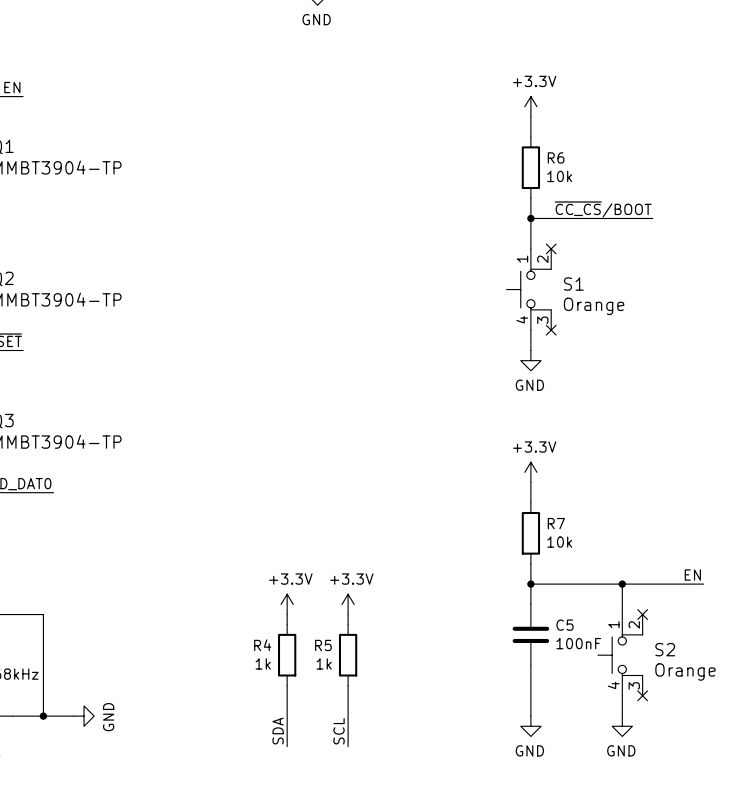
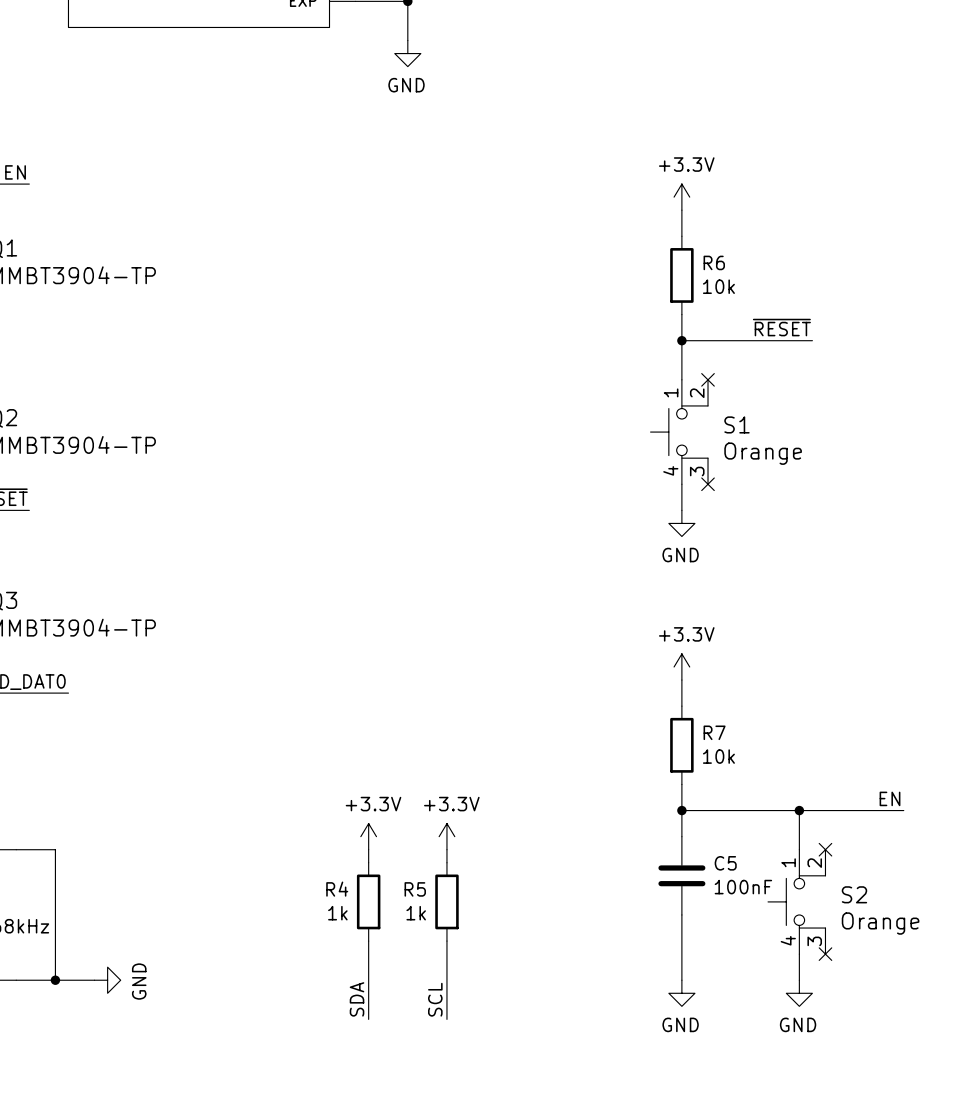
label: none -> ~{RESET} (781, 327)
label: ~{CC_CS}/BOOT (603, 209) -> none
wire: (632, 218) (652, 218) -> none

